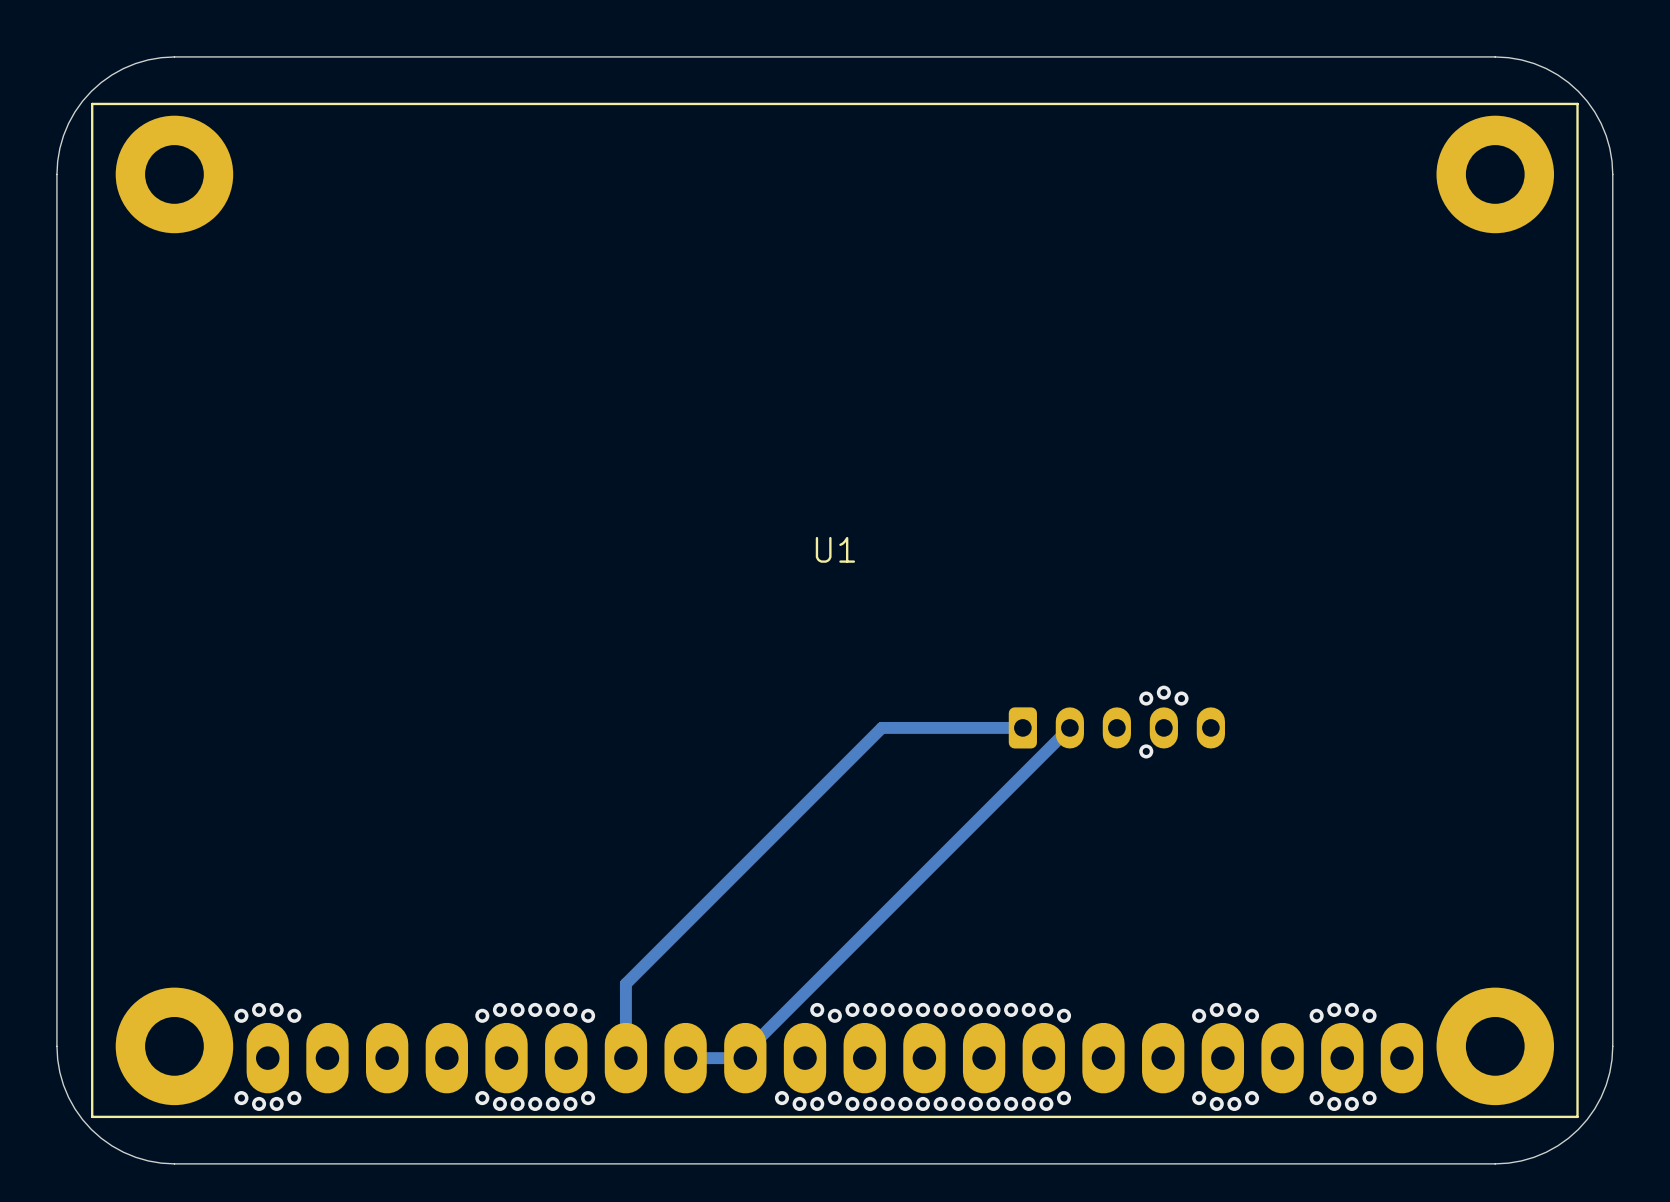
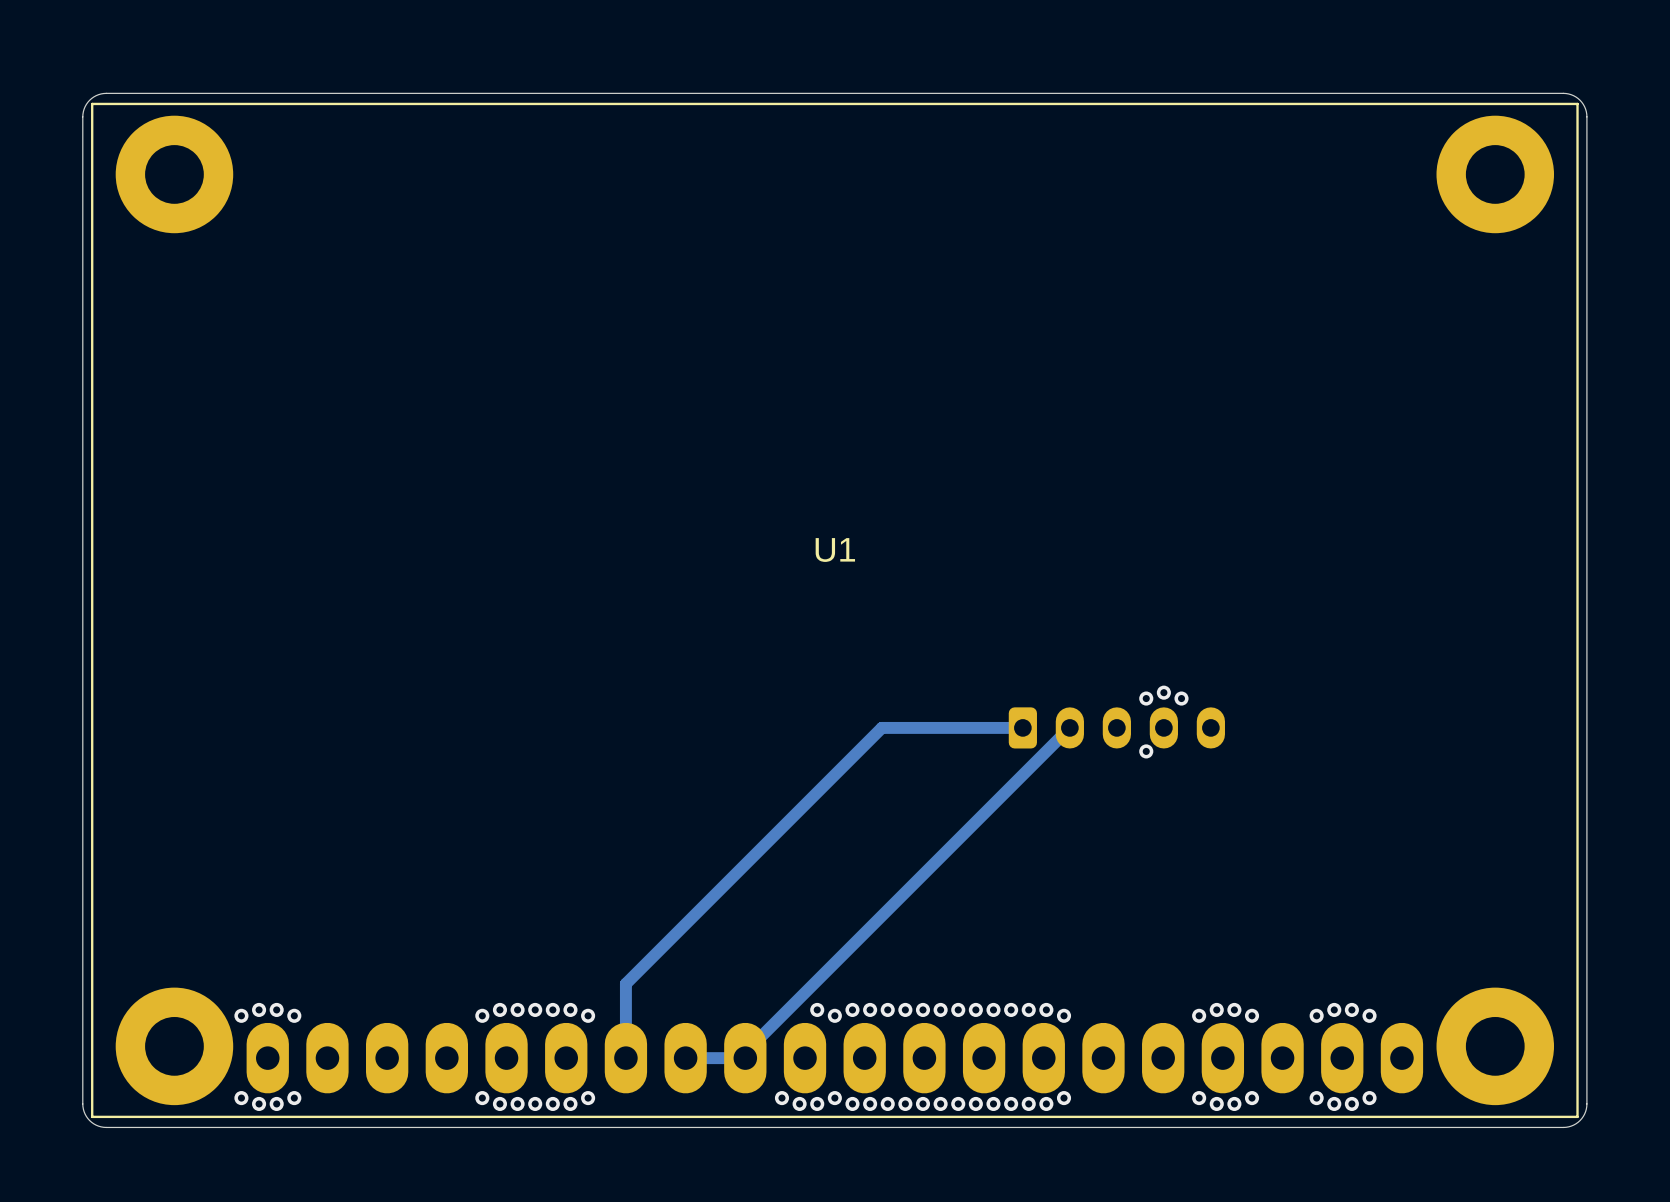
board edge: (1495, 56) (174, 56) (135, 63) (101, 82) (82, 101) (68, 123) (59, 148) (56, 174) (56, 1046) (63, 1085) (82, 1119) (101, 1138) (123, 1152) (148, 1160) (174, 1163) (1495, 1163) (1534, 1157) (1568, 1138) (1587, 1119) (1601, 1097) (1609, 1072) (1612, 1046) (1612, 161) (1601, 123) (1587, 101) (1568, 82) (1534, 63) (1495, 56) -> (1563, 93) (1571, 94) (1580, 100) (1585, 109) (1586, 116) (1586, 1103) (1583, 1116) (1575, 1123) (1563, 1127) (106, 1127) (96, 1125) (86, 1116) (82, 1103) (82, 116) (86, 104) (93, 96) (106, 93) (1563, 93)

